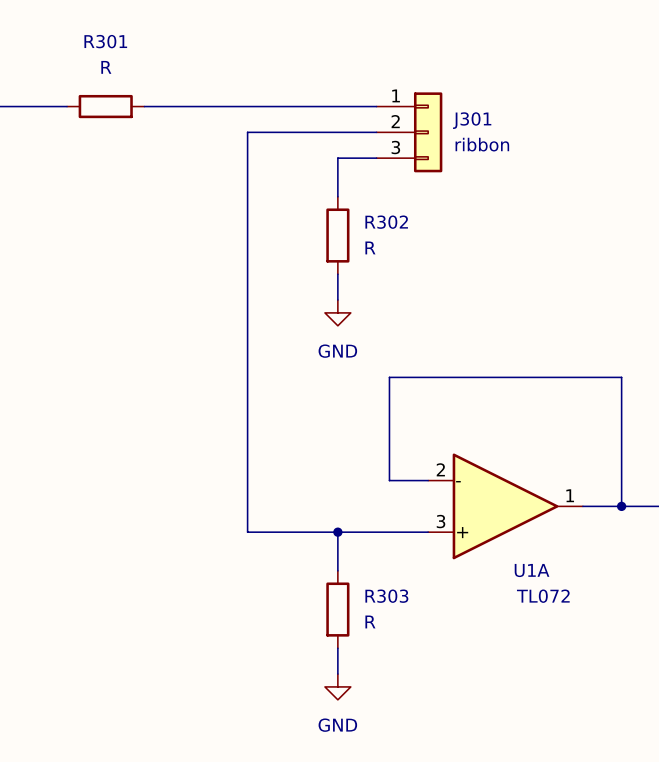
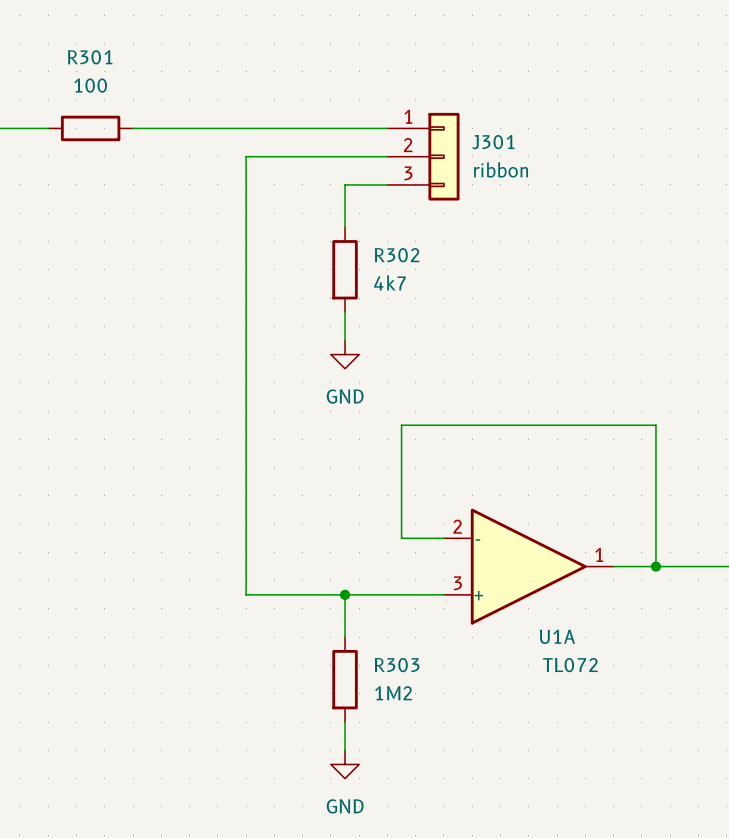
R301 value: R (106, 67) -> 100 (90, 85)
R302 value: R (370, 247) -> 4k7 (390, 282)
R303 value: R (370, 621) -> 1M2 (393, 693)

